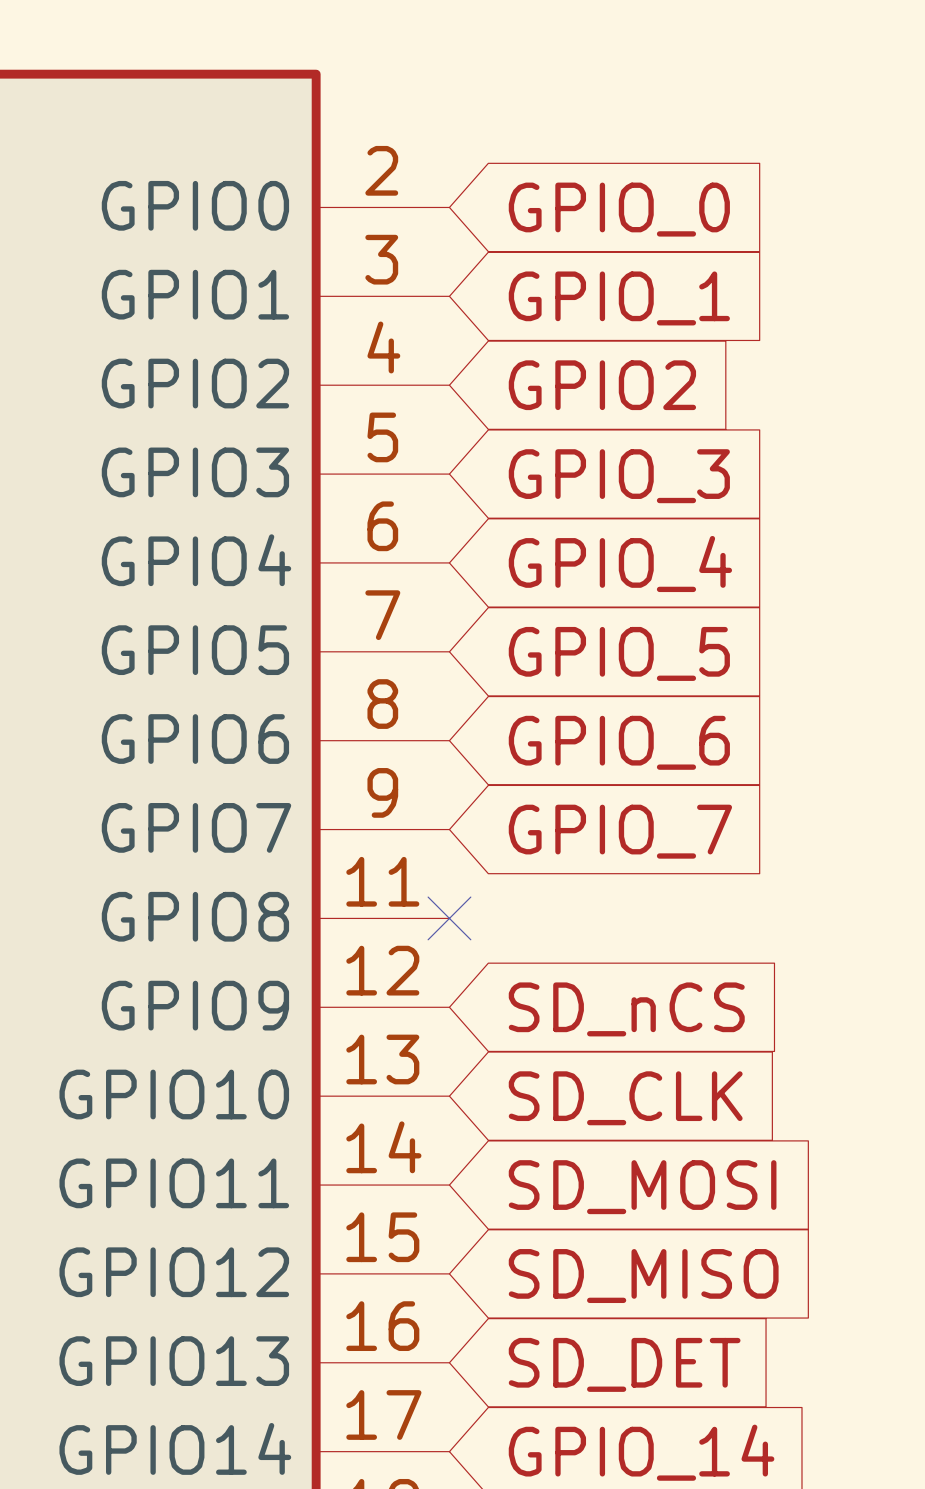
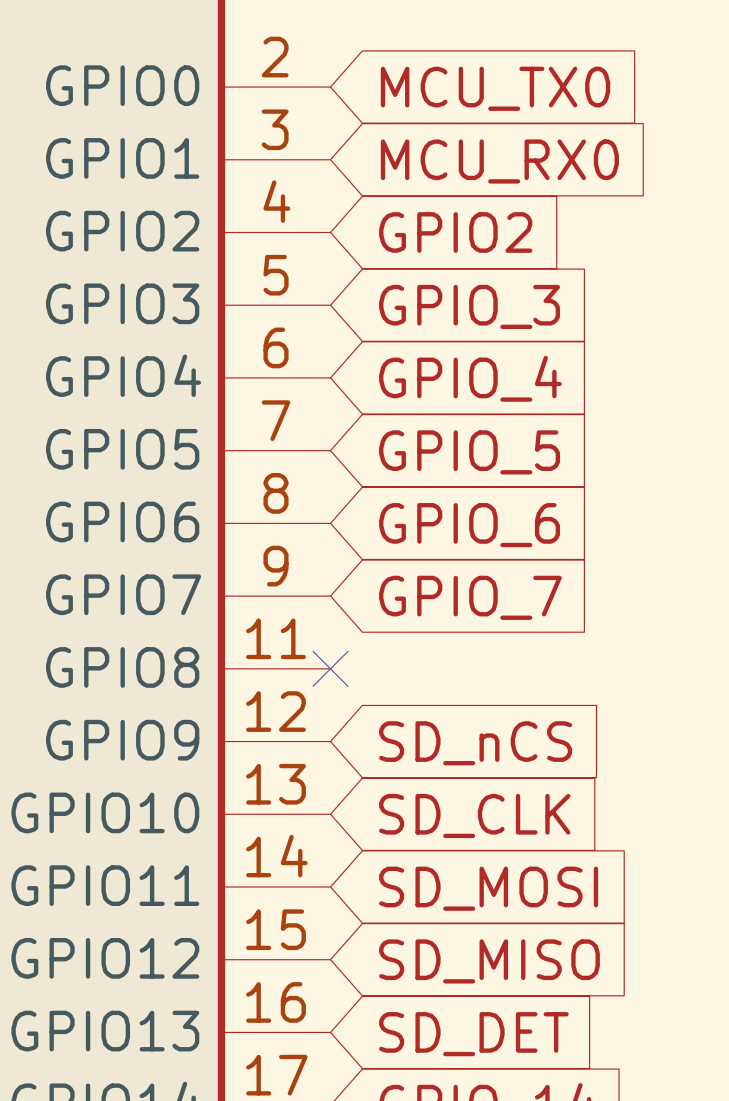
global label: GPIO_0 (619, 209) -> MCU_TX0 (495, 88)
global label: GPIO_1 (619, 298) -> MCU_RX0 (499, 161)

